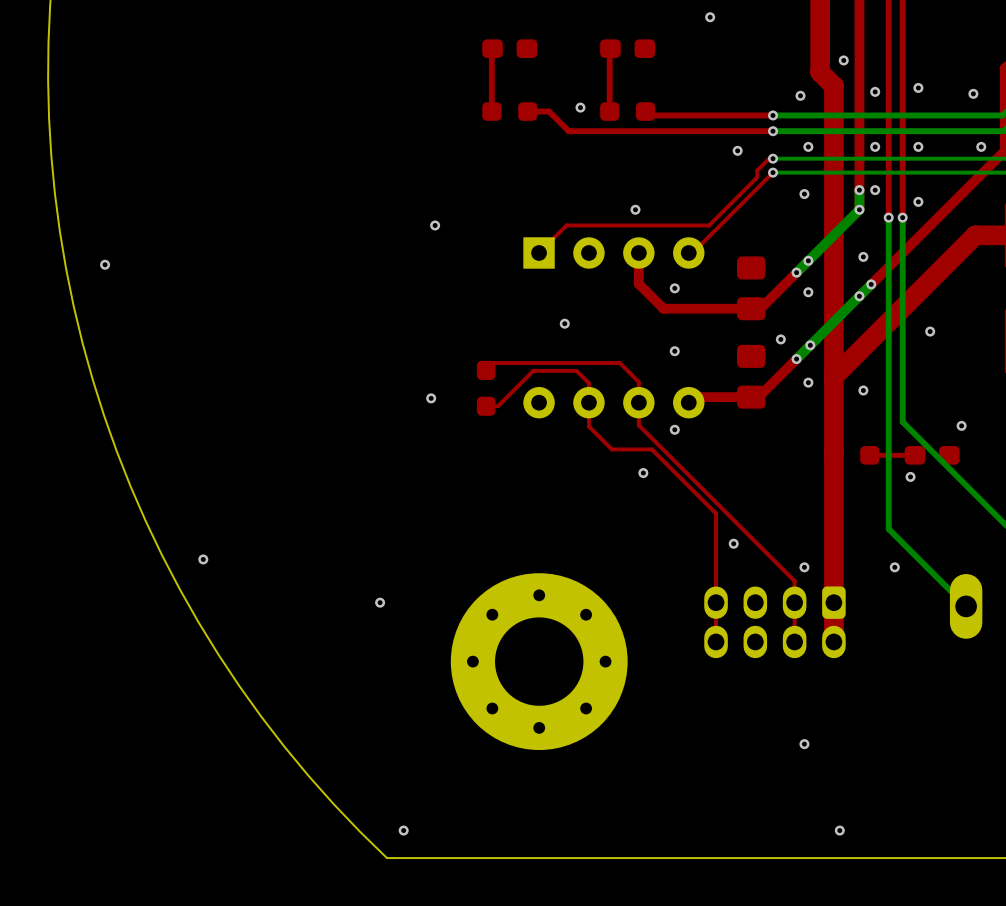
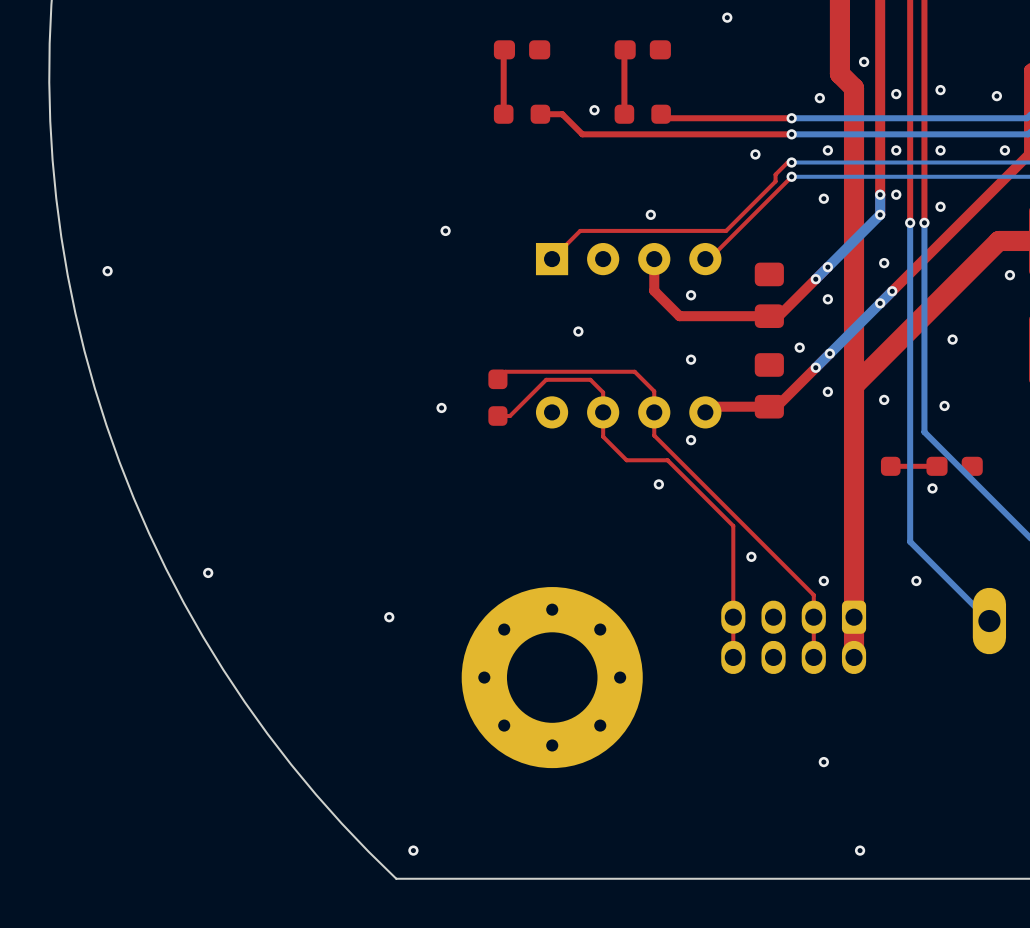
via: none -> (1009, 275)
via position: (961, 425) -> (944, 405)

